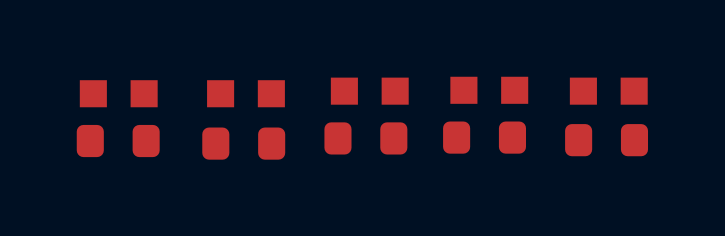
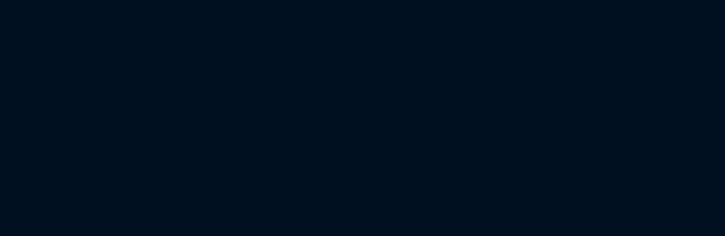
part: (489, 90) -> none
part: (369, 91) -> none
part: (608, 91) -> none
part: (118, 93) -> none
part: (245, 93) -> none
part: (484, 137) -> none
part: (365, 138) -> none
part: (606, 140) -> none
part: (118, 141) -> none
part: (243, 143) -> none

